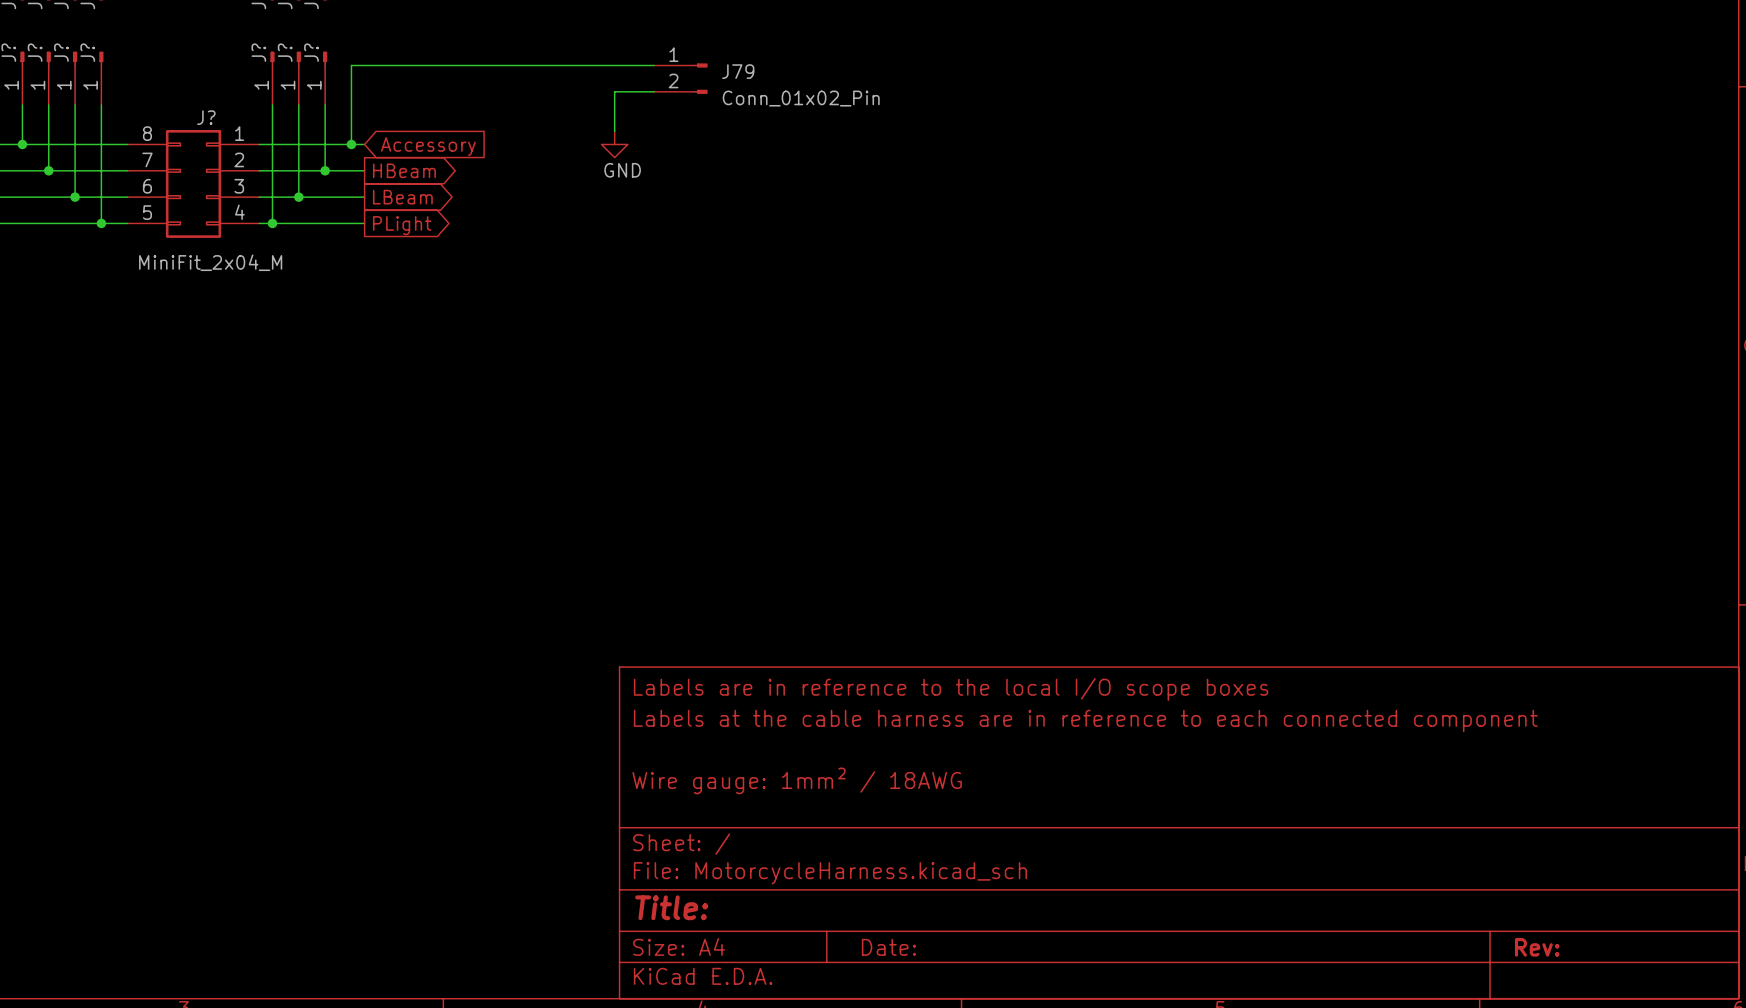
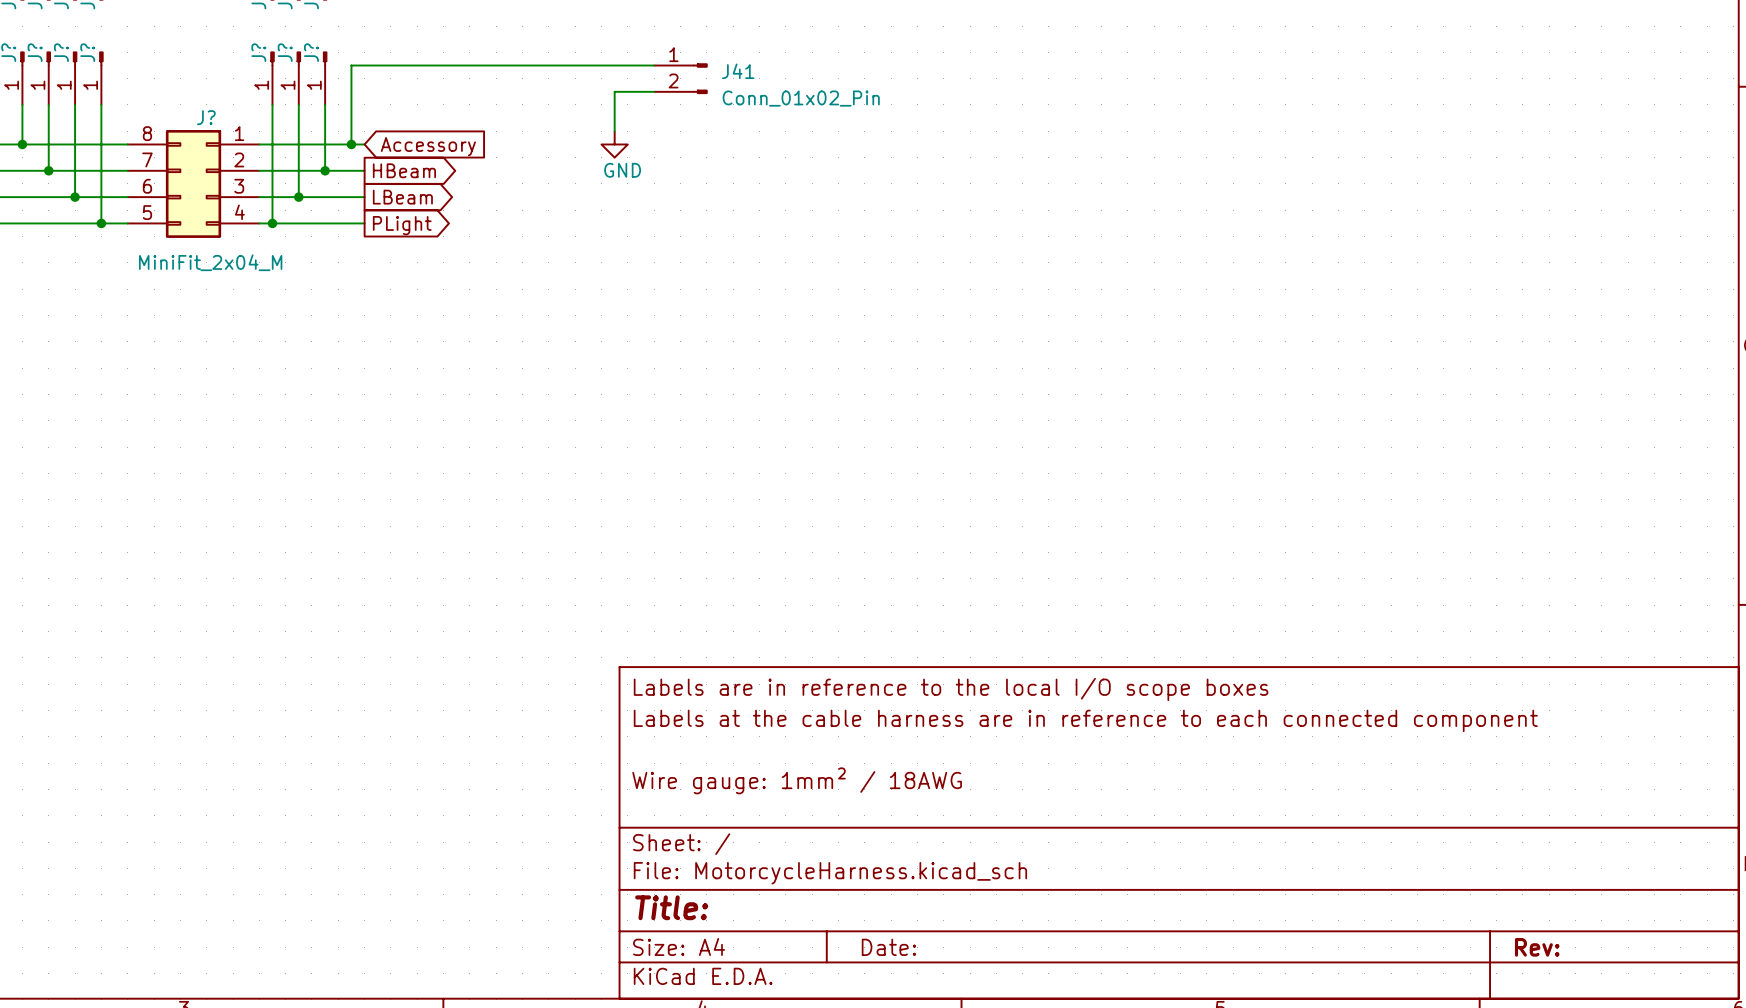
J79 name: J79 (738, 71) -> J41 (738, 71)

